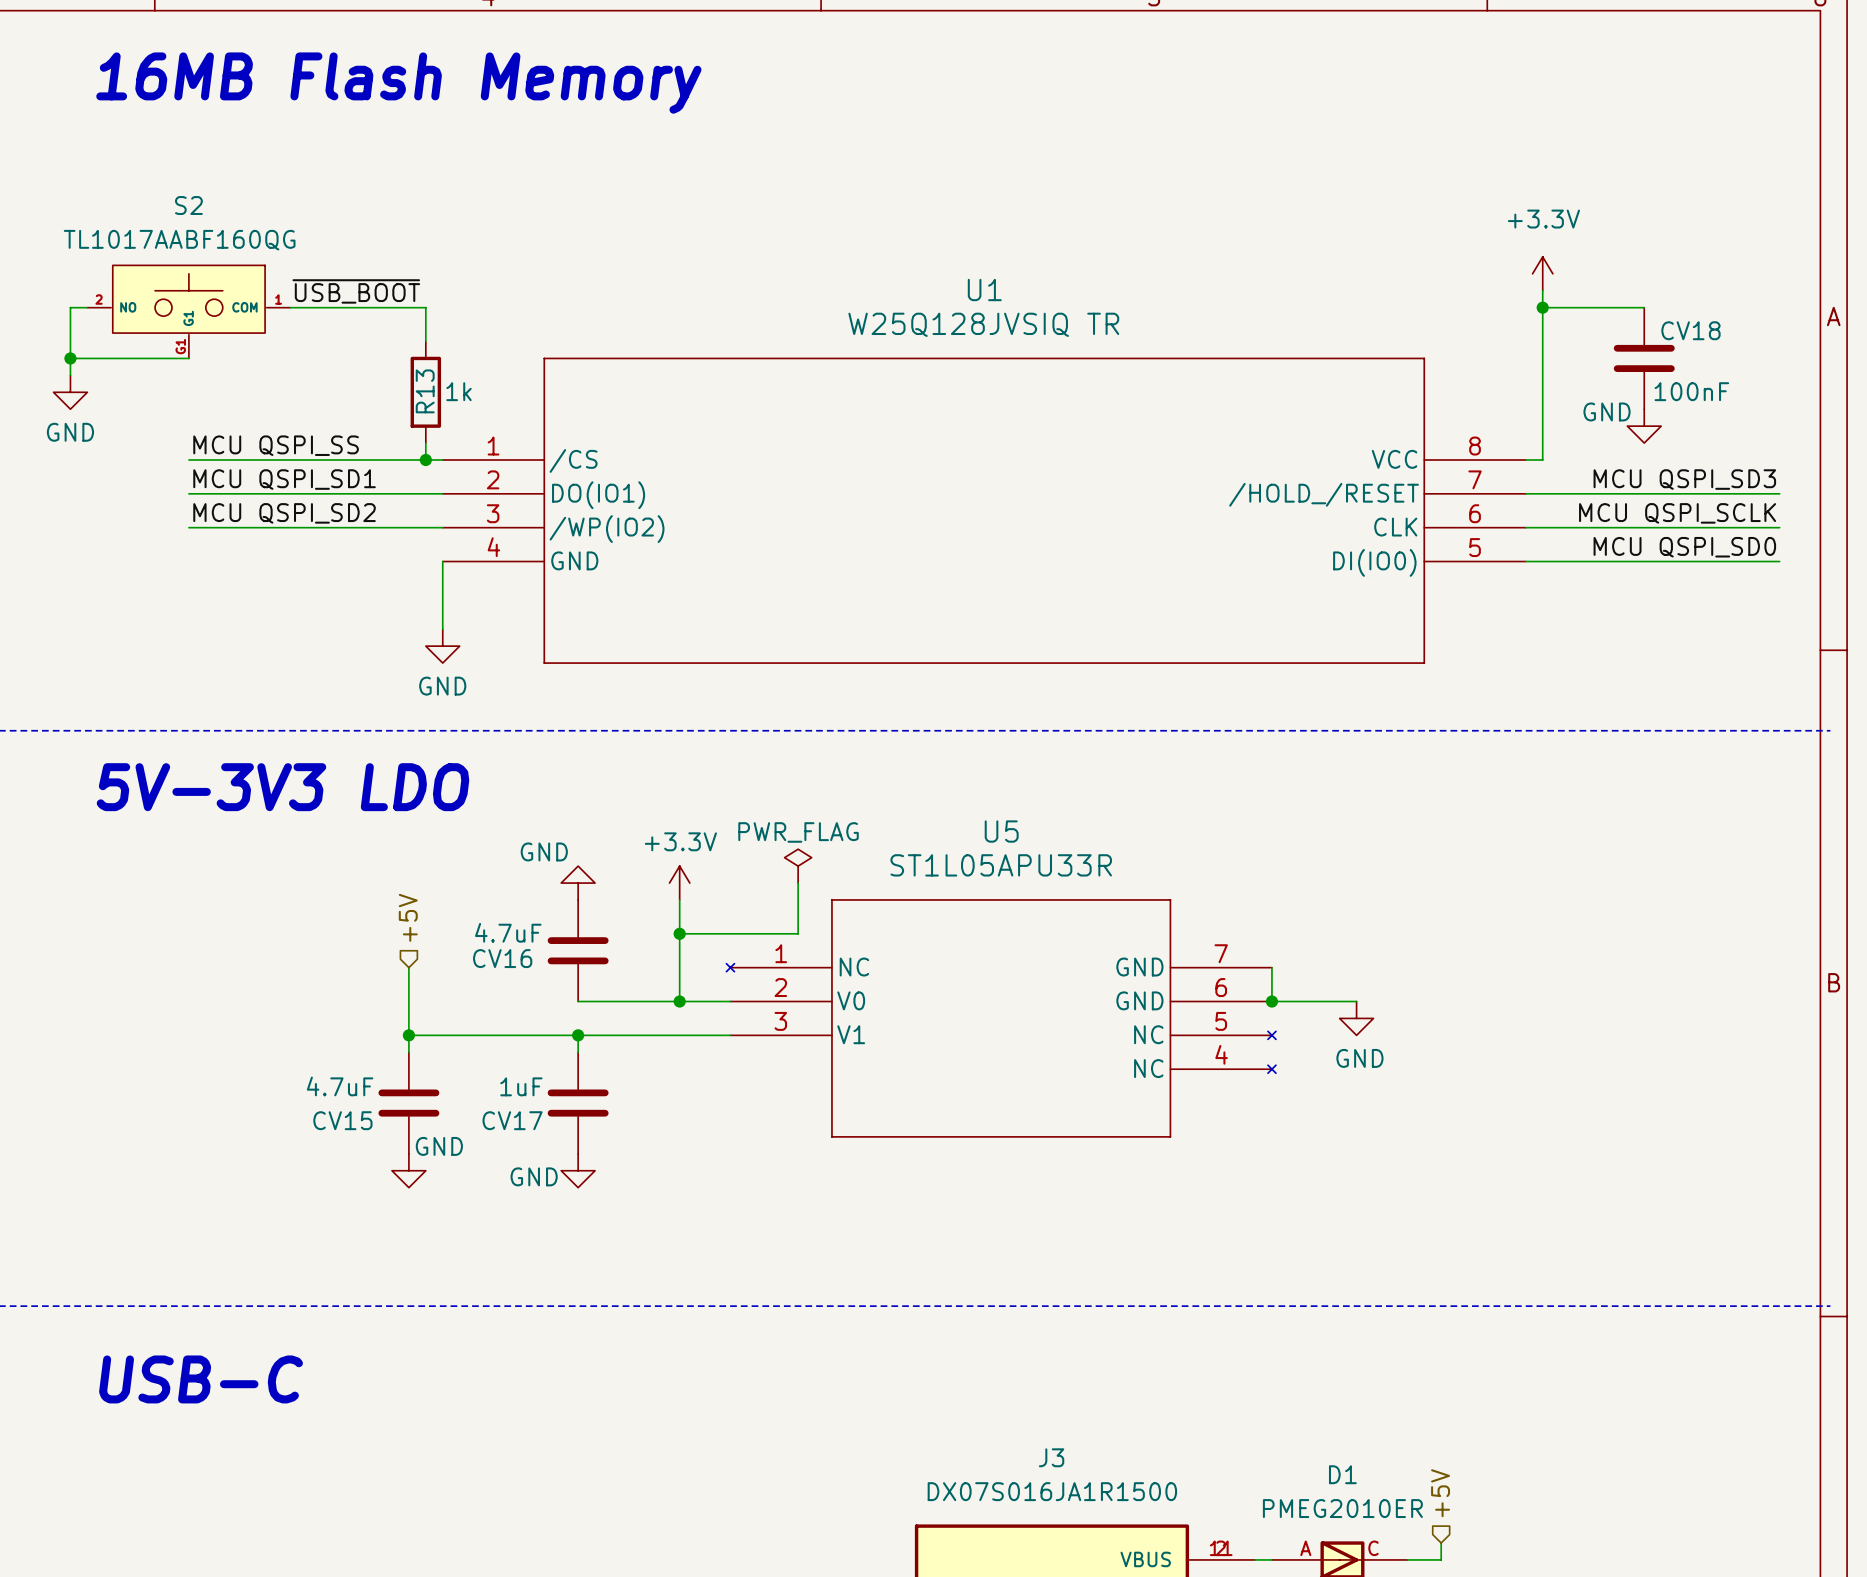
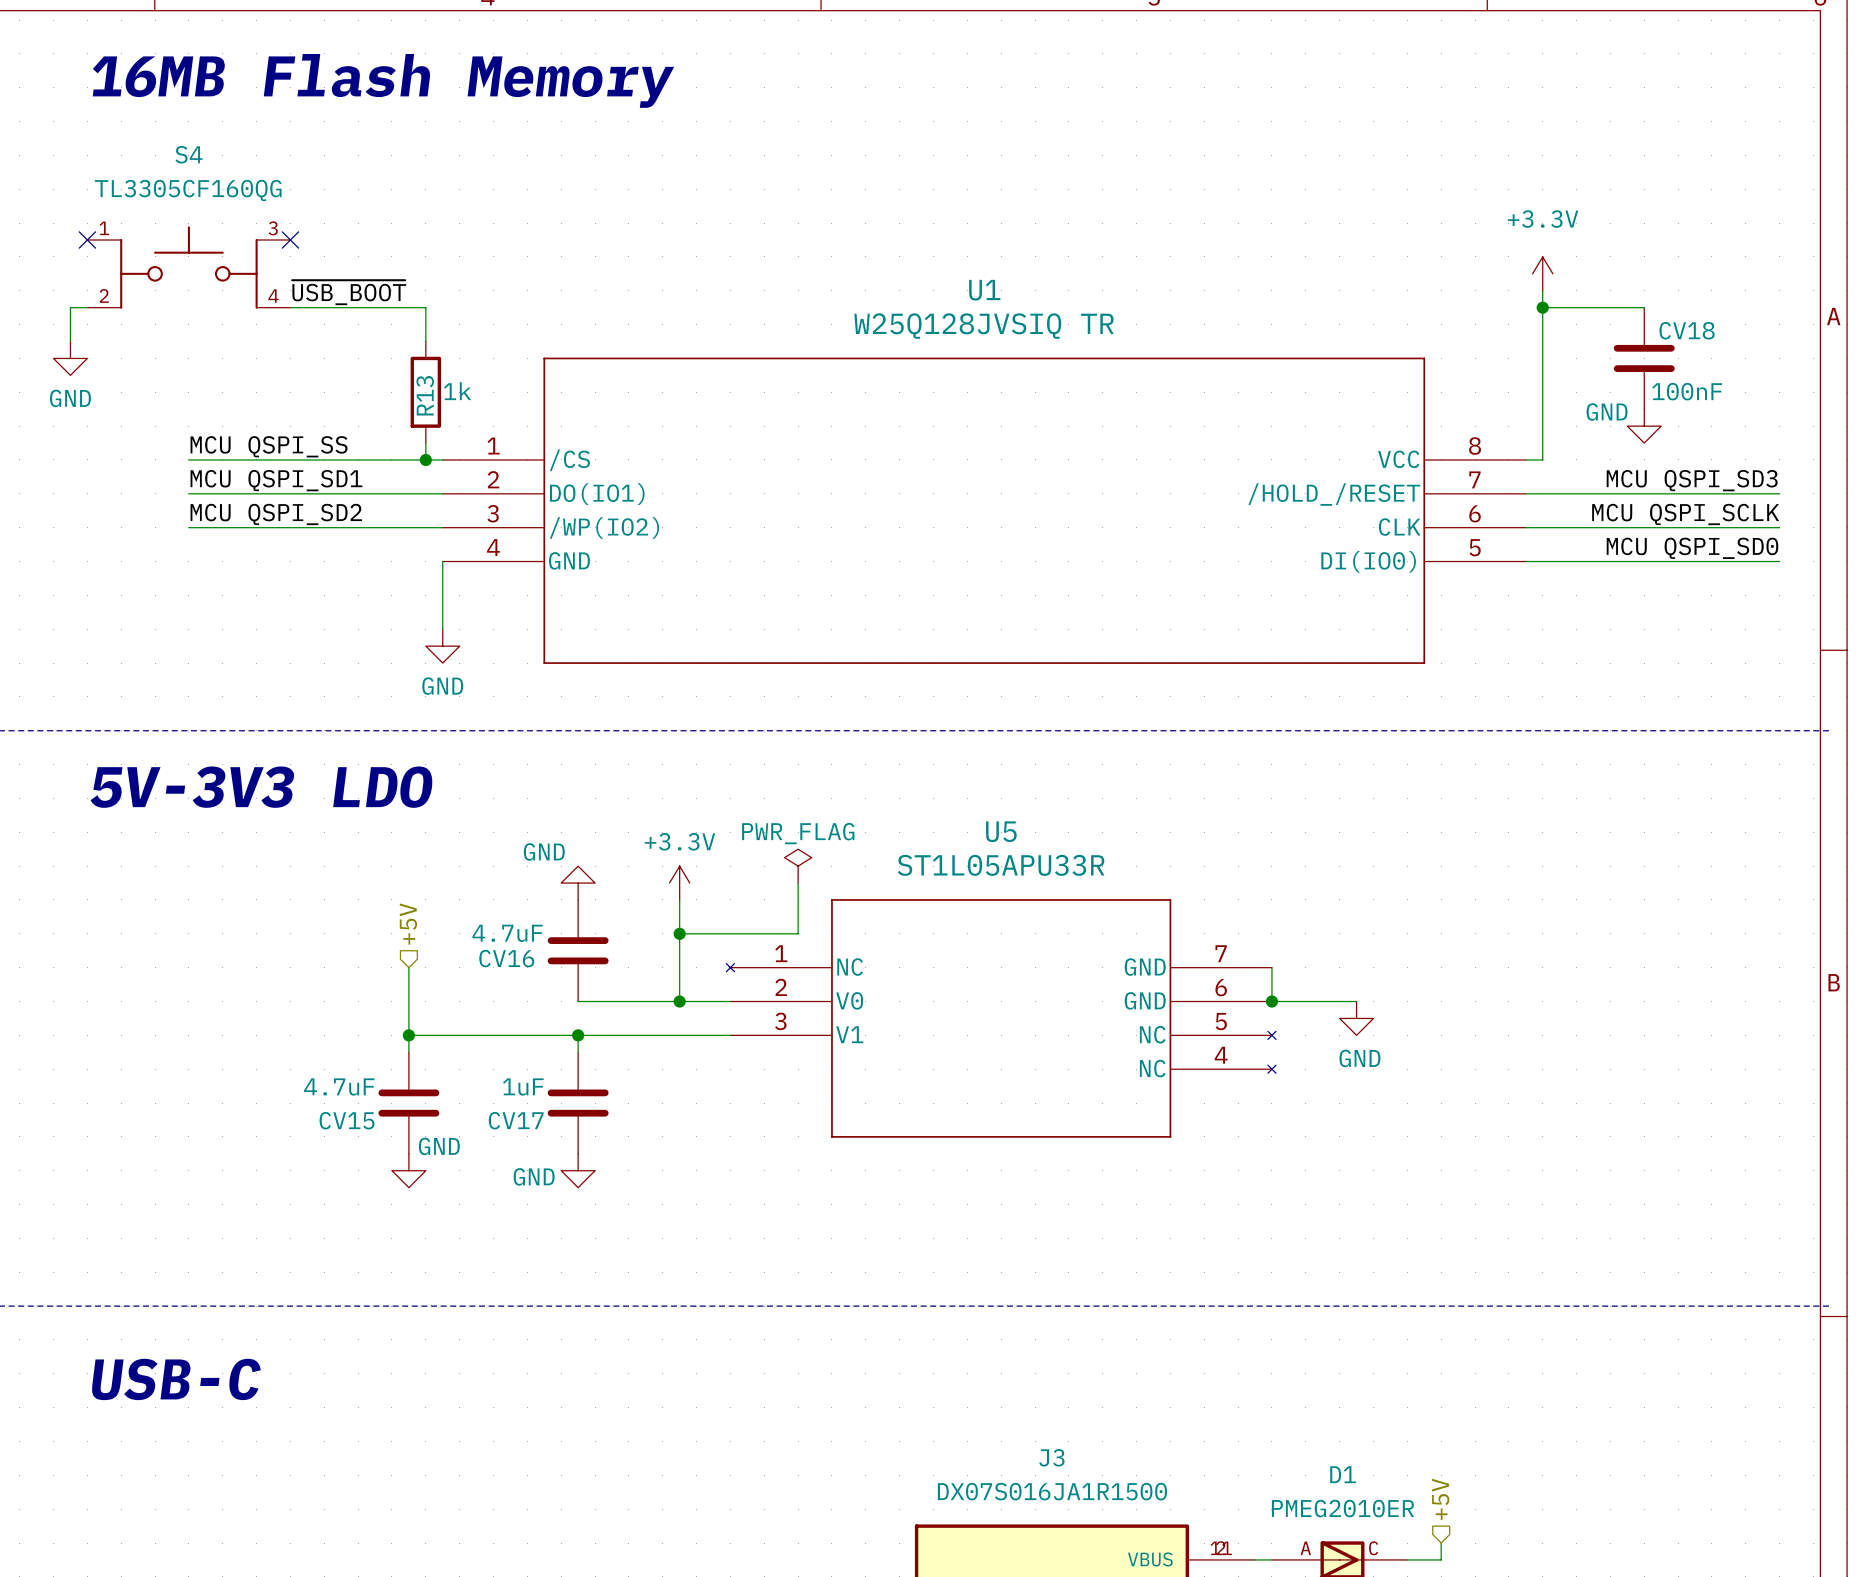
no-connect mark: none -> (87, 239)
no-connect mark: none -> (290, 239)
S4: none -> TL3305CF160QG (188, 267)
S2: TL1017AABF160QG (188, 311) -> none
wire: (70, 358) (188, 358) -> none
junction: (70, 358) -> none
power symbol position: GND (70, 392) -> GND (70, 358)

